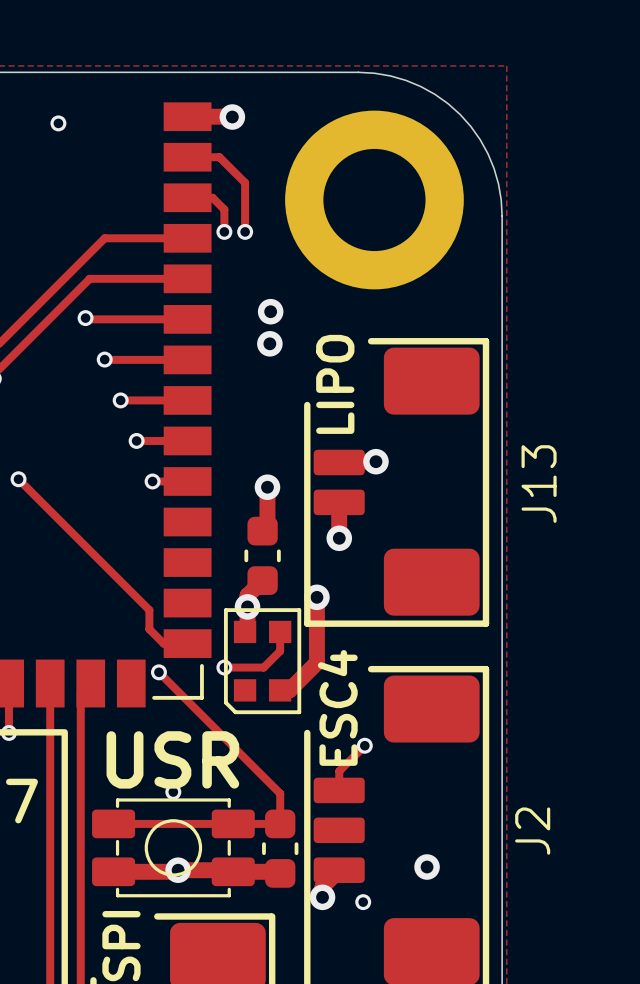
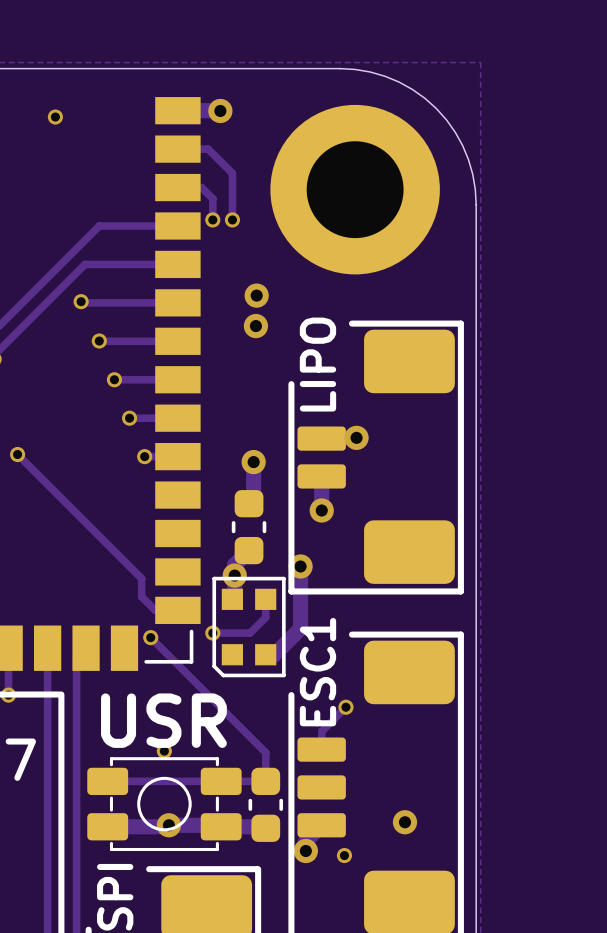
J13 name: J13 (539, 484) -> none
text: ESC4 (337, 707) -> ESC1 (317, 672)
J2 name: J2 (532, 831) -> none

